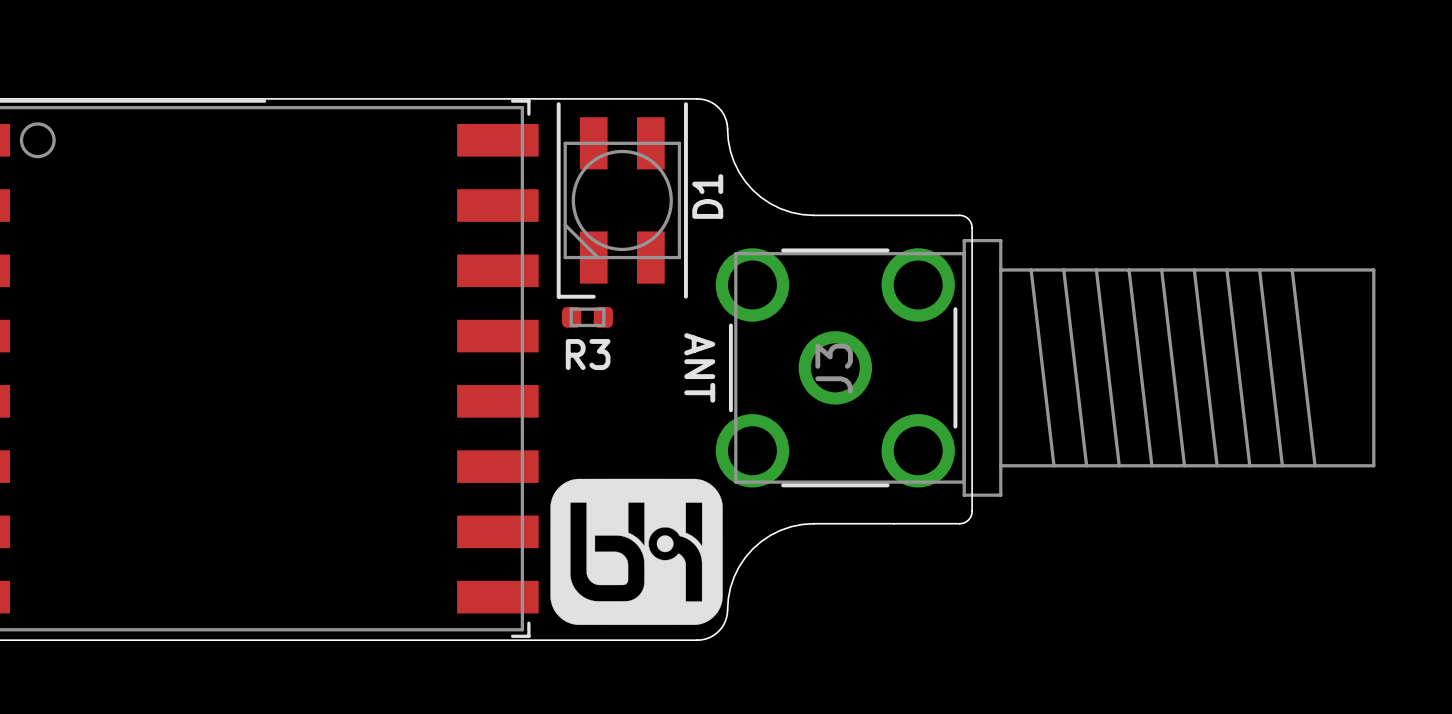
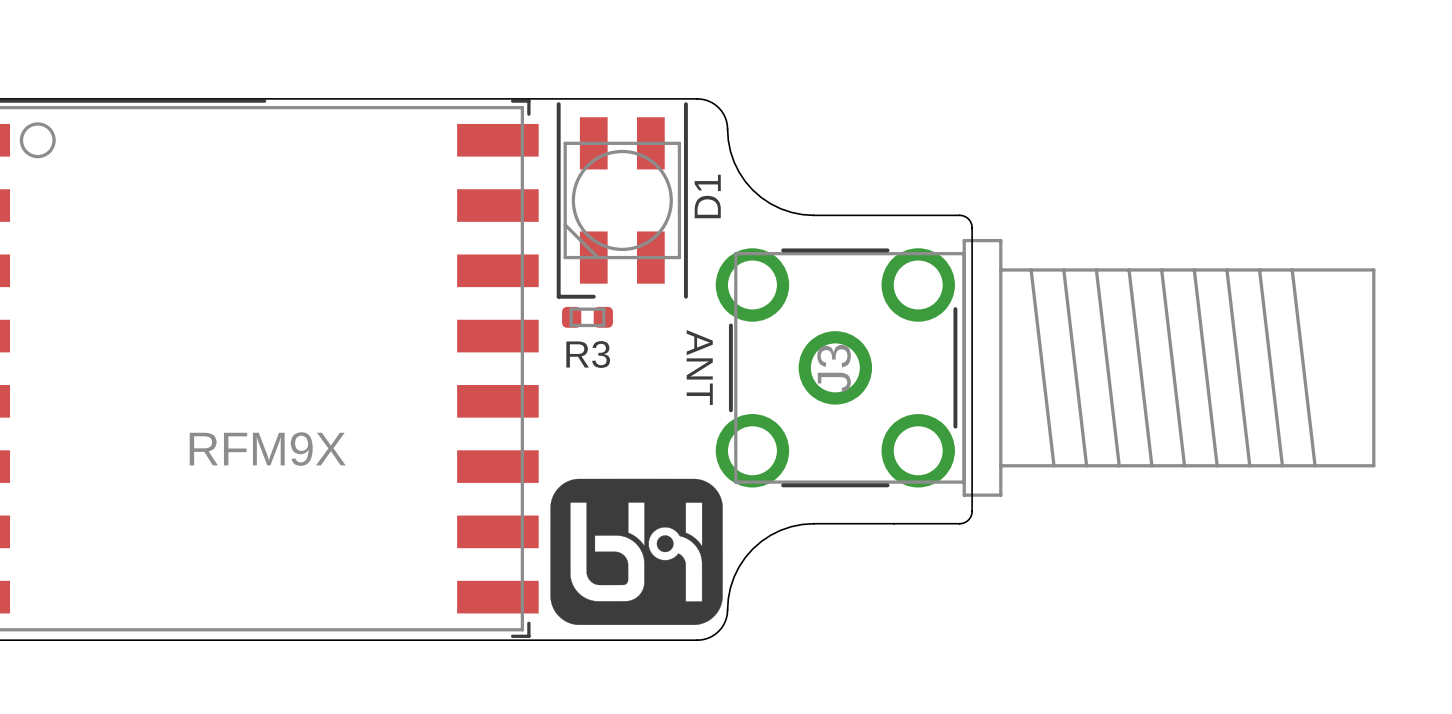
part value: none -> RFM9X (267, 449)

